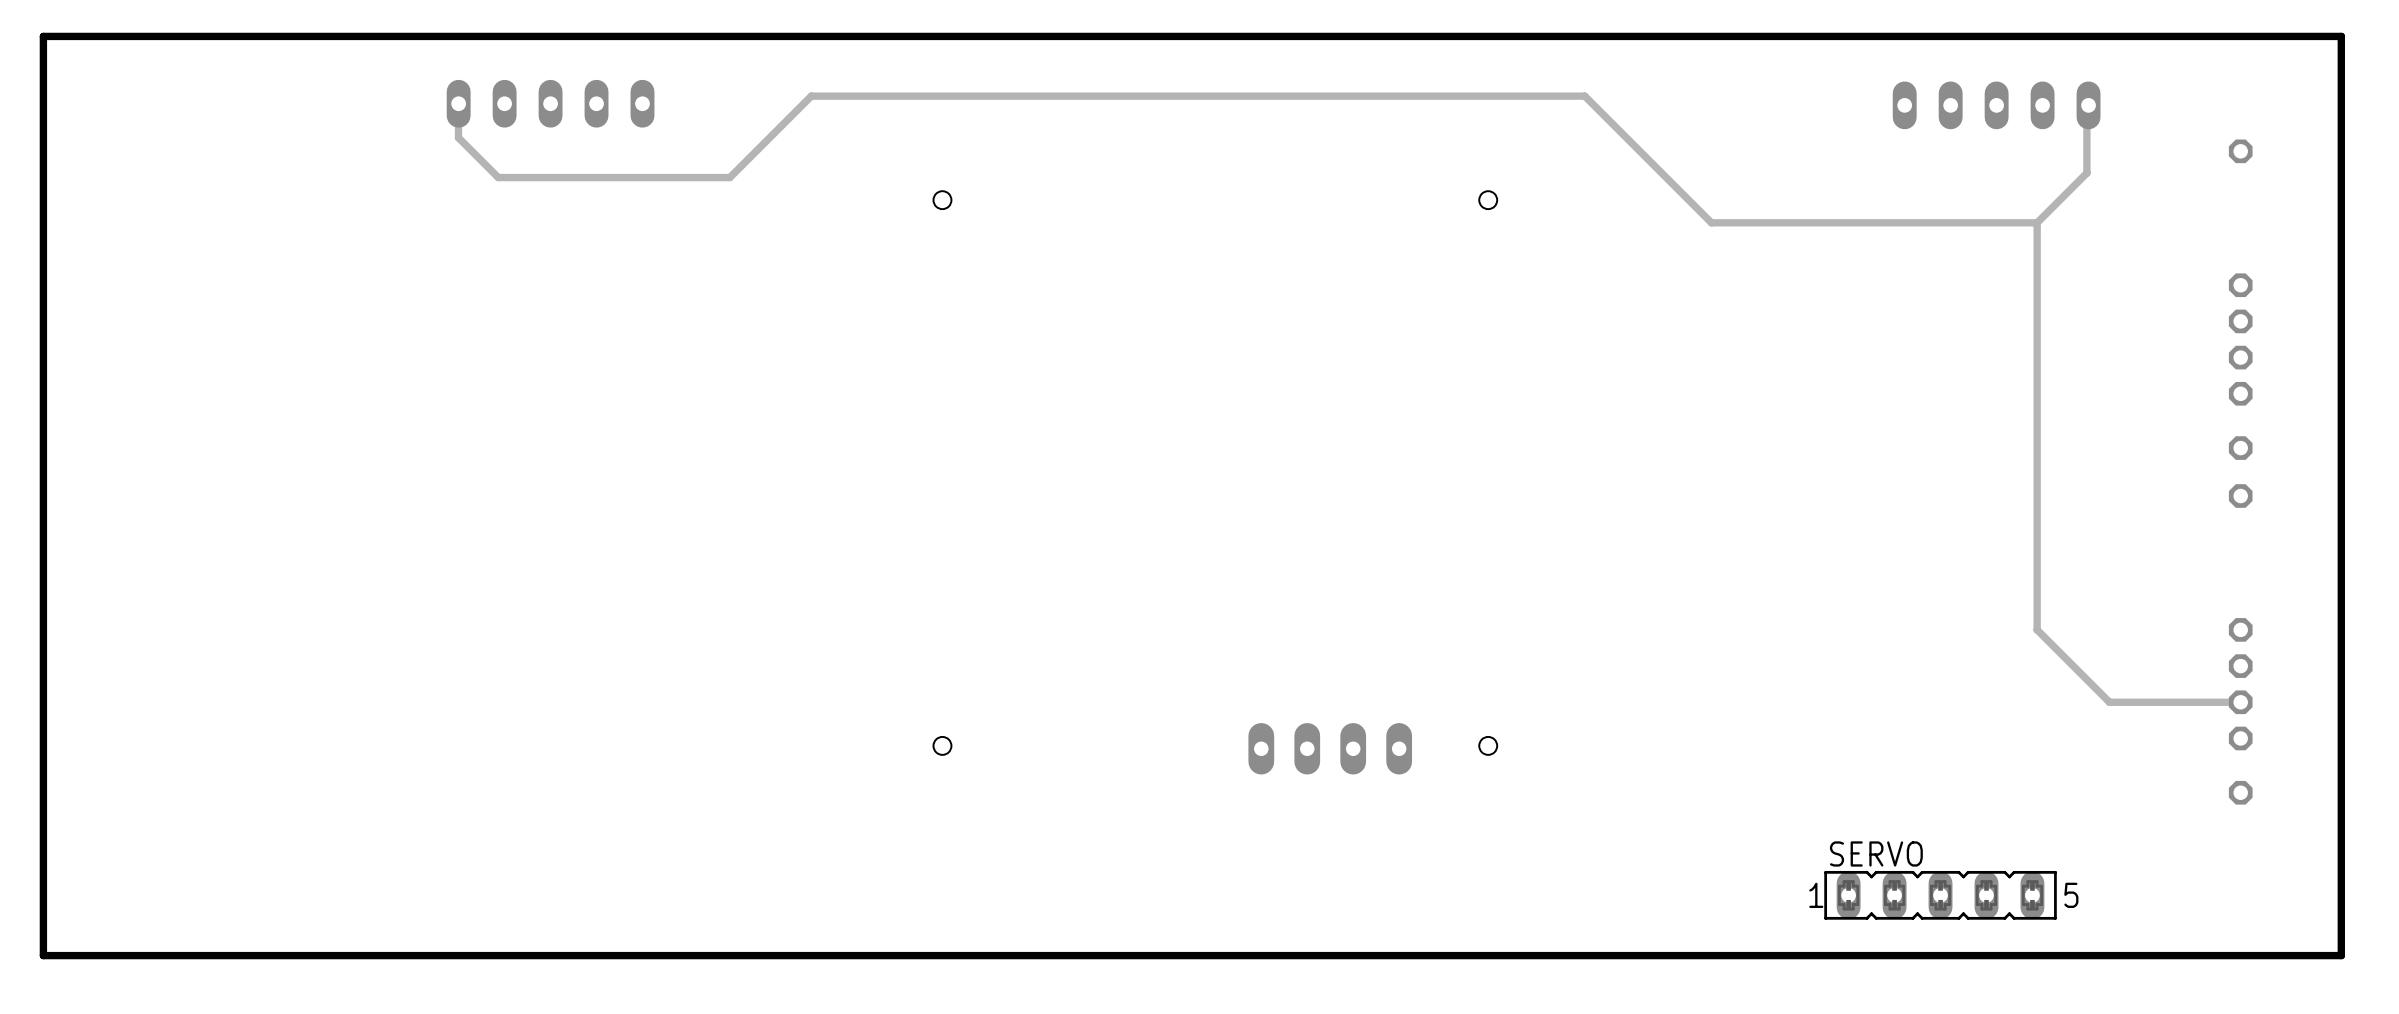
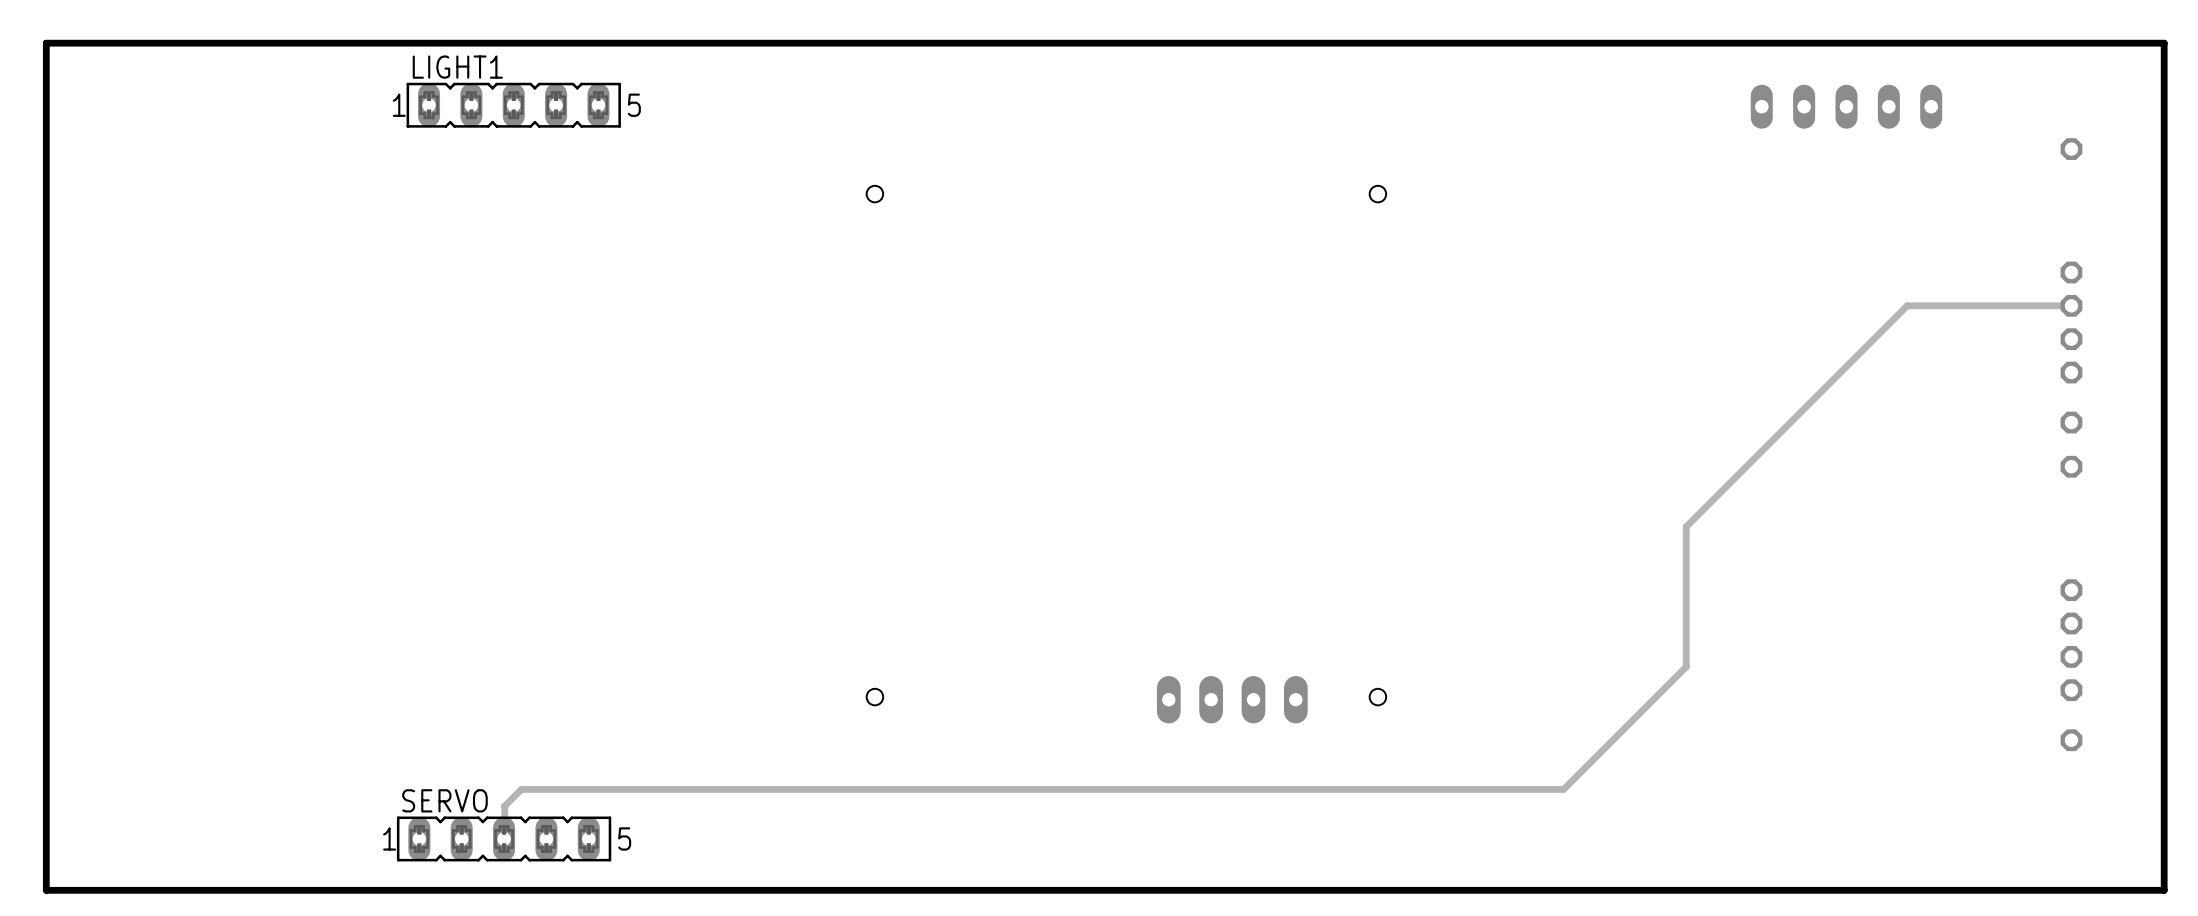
track: (458, 103) (458, 137) (498, 177) (729, 177) (811, 96) (1584, 96) (1711, 222) (2037, 222) -> none
LIGHT1 side: top (550, 103) -> bottom (513, 105)
track: (2088, 105) (2086, 107) (2086, 173) (2037, 222) -> none
track: (2037, 222) (2037, 629) (2109, 702) (2240, 702) -> none
track: none -> (2071, 305) (1907, 305) (1686, 526) (1686, 666) (1563, 789) (521, 789) (504, 806) (504, 837)
SERVO: (1940, 895) -> none
SERVO: none -> (504, 838)

